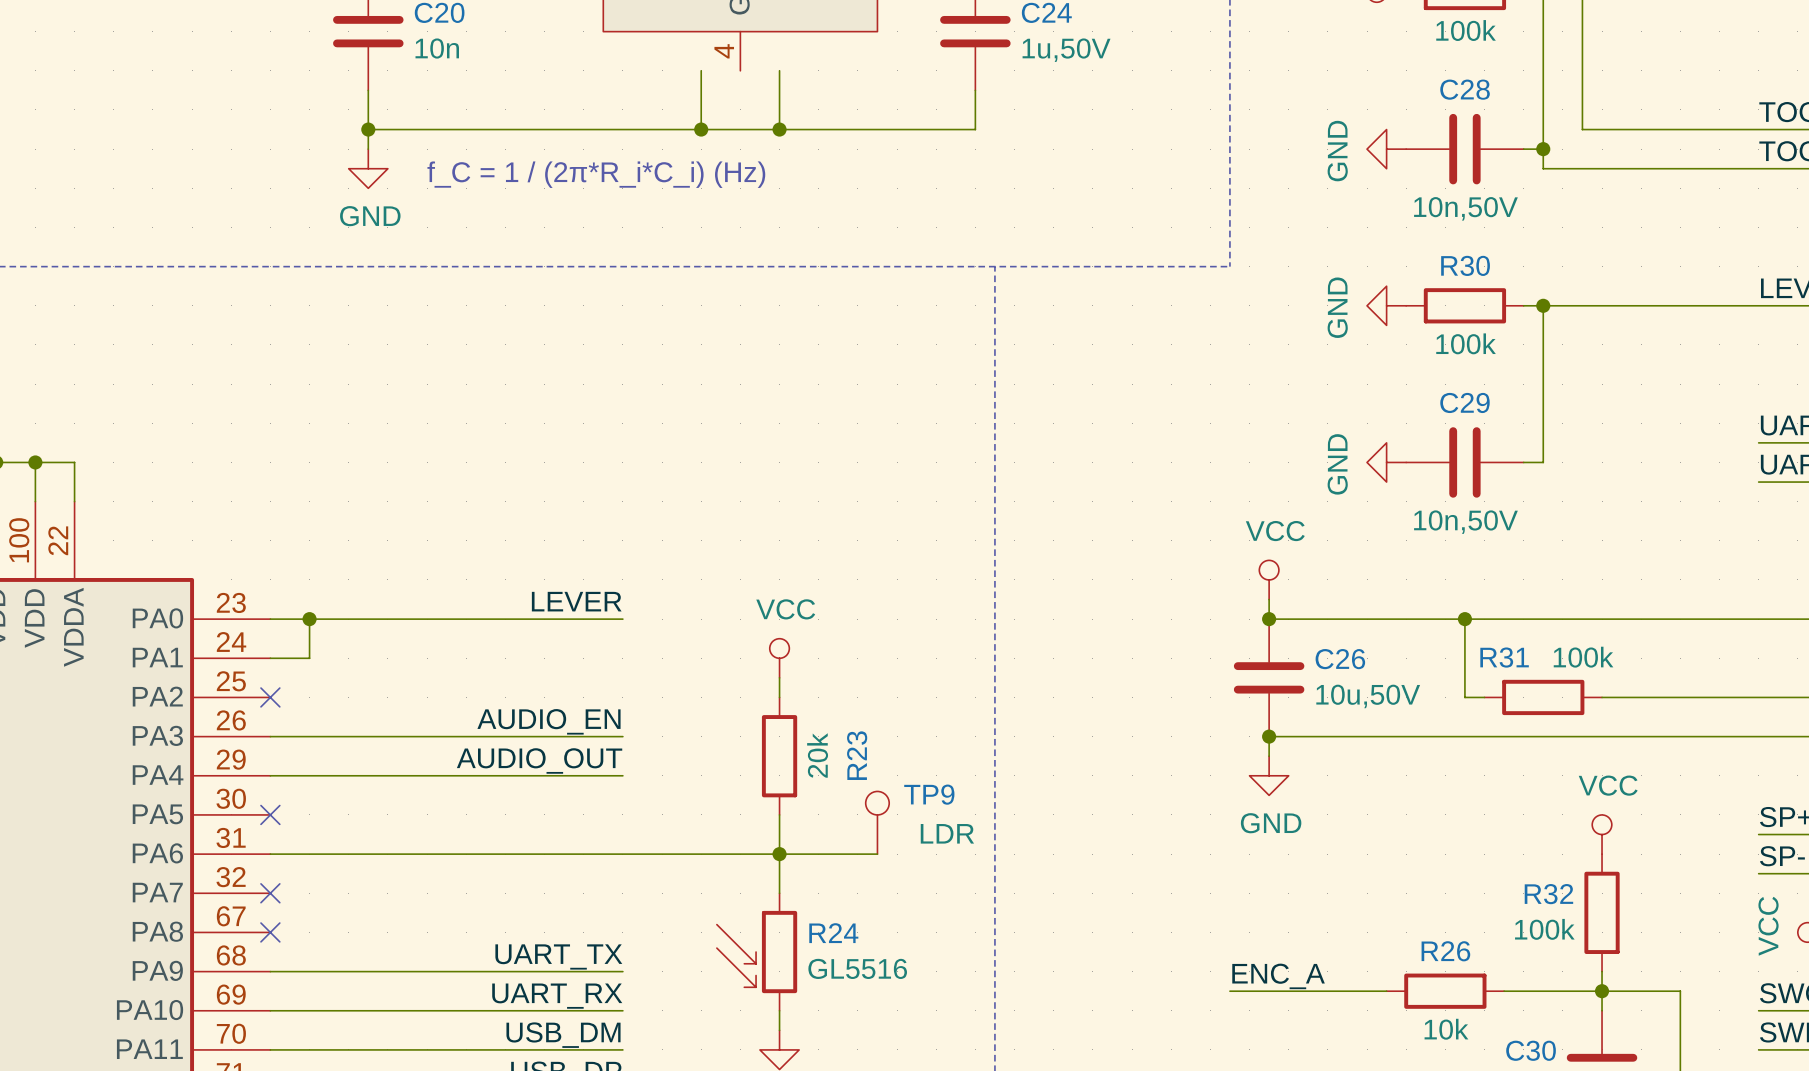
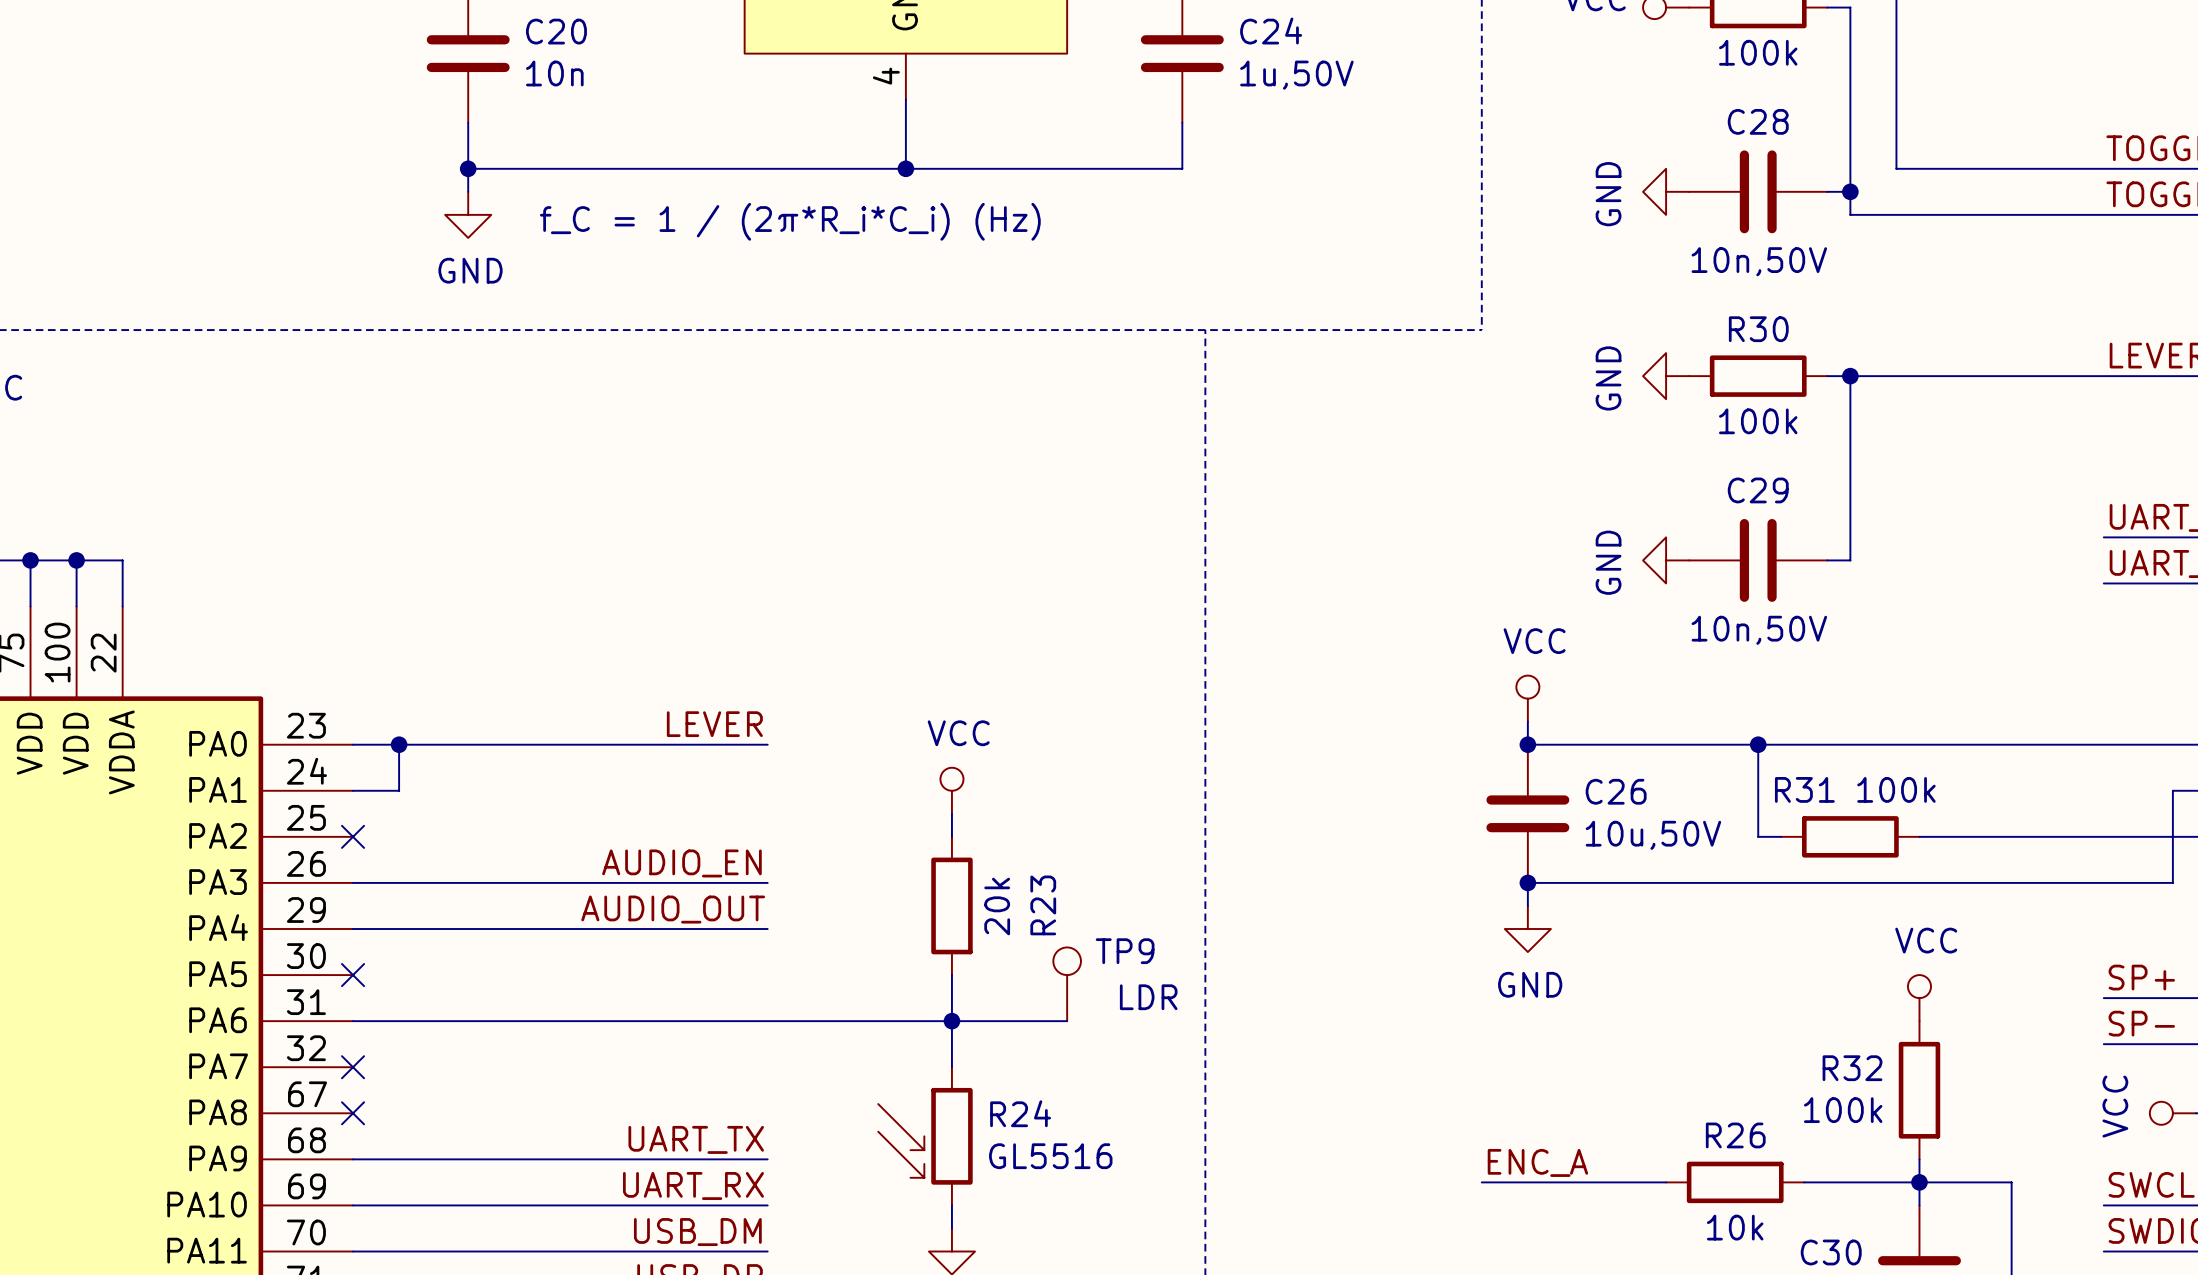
wire: (701, 70) (701, 129) -> (905, 99) (905, 168)
wire: (779, 70) (779, 129) -> none
junction: (701, 129) -> none
junction: none -> (905, 168)
junction: (779, 129) -> none

